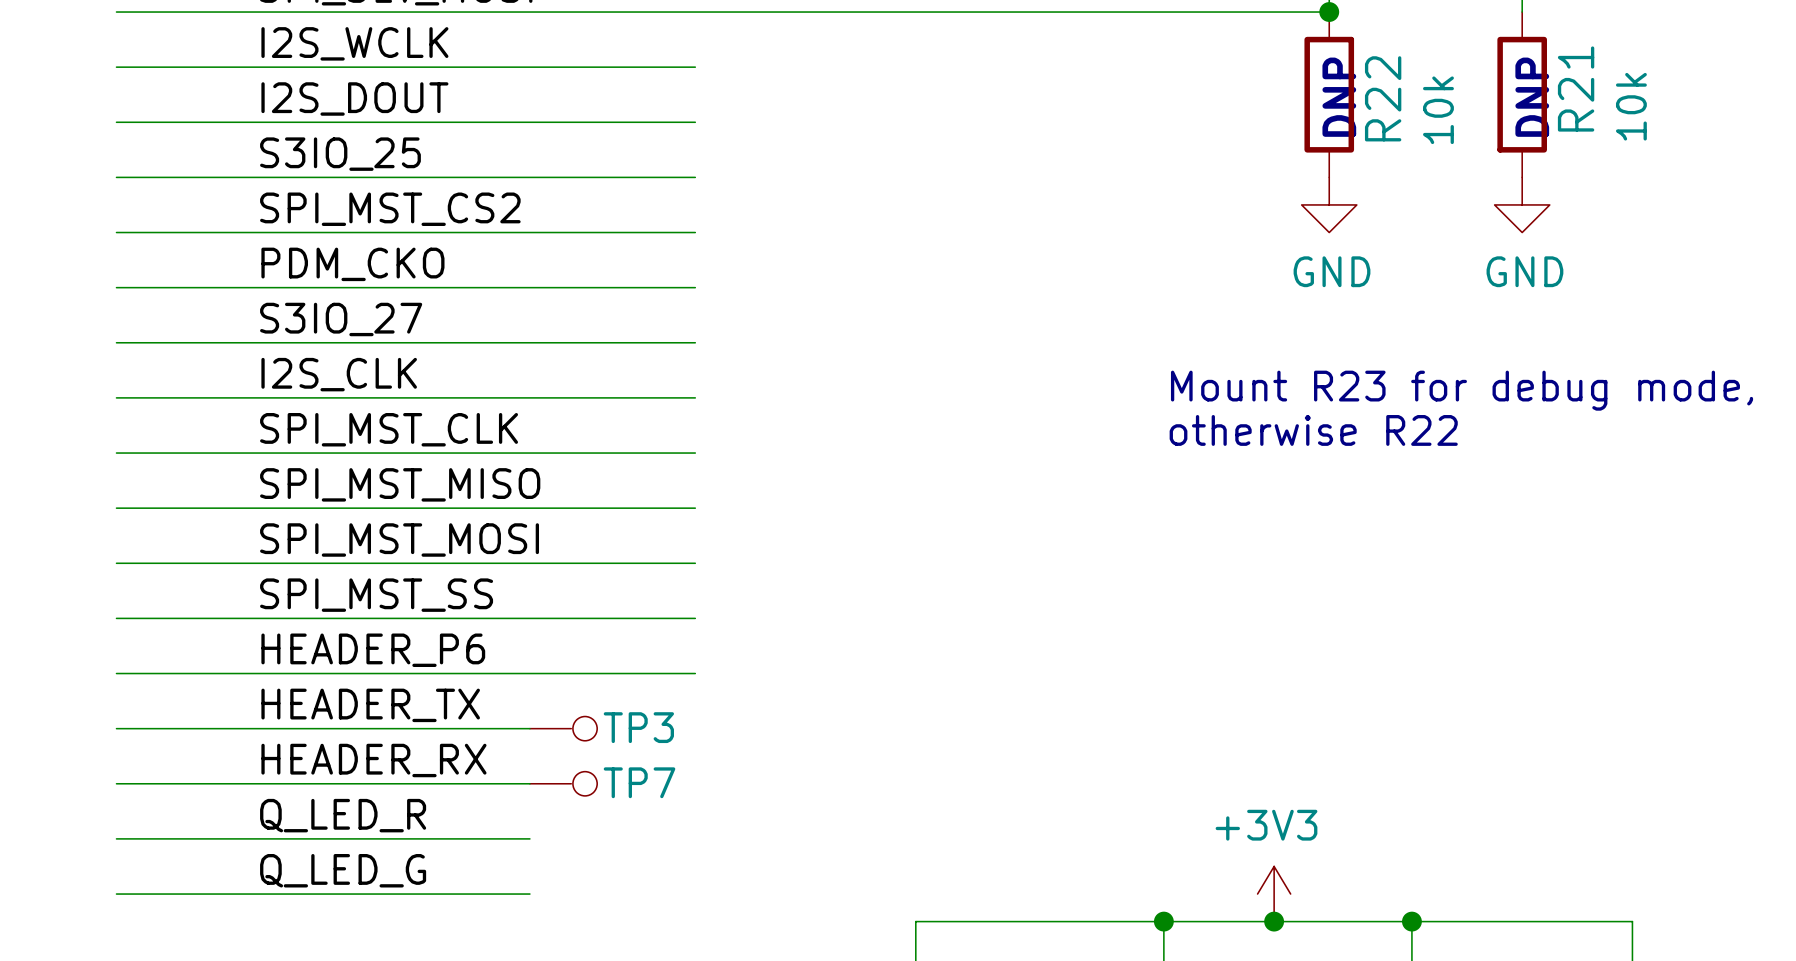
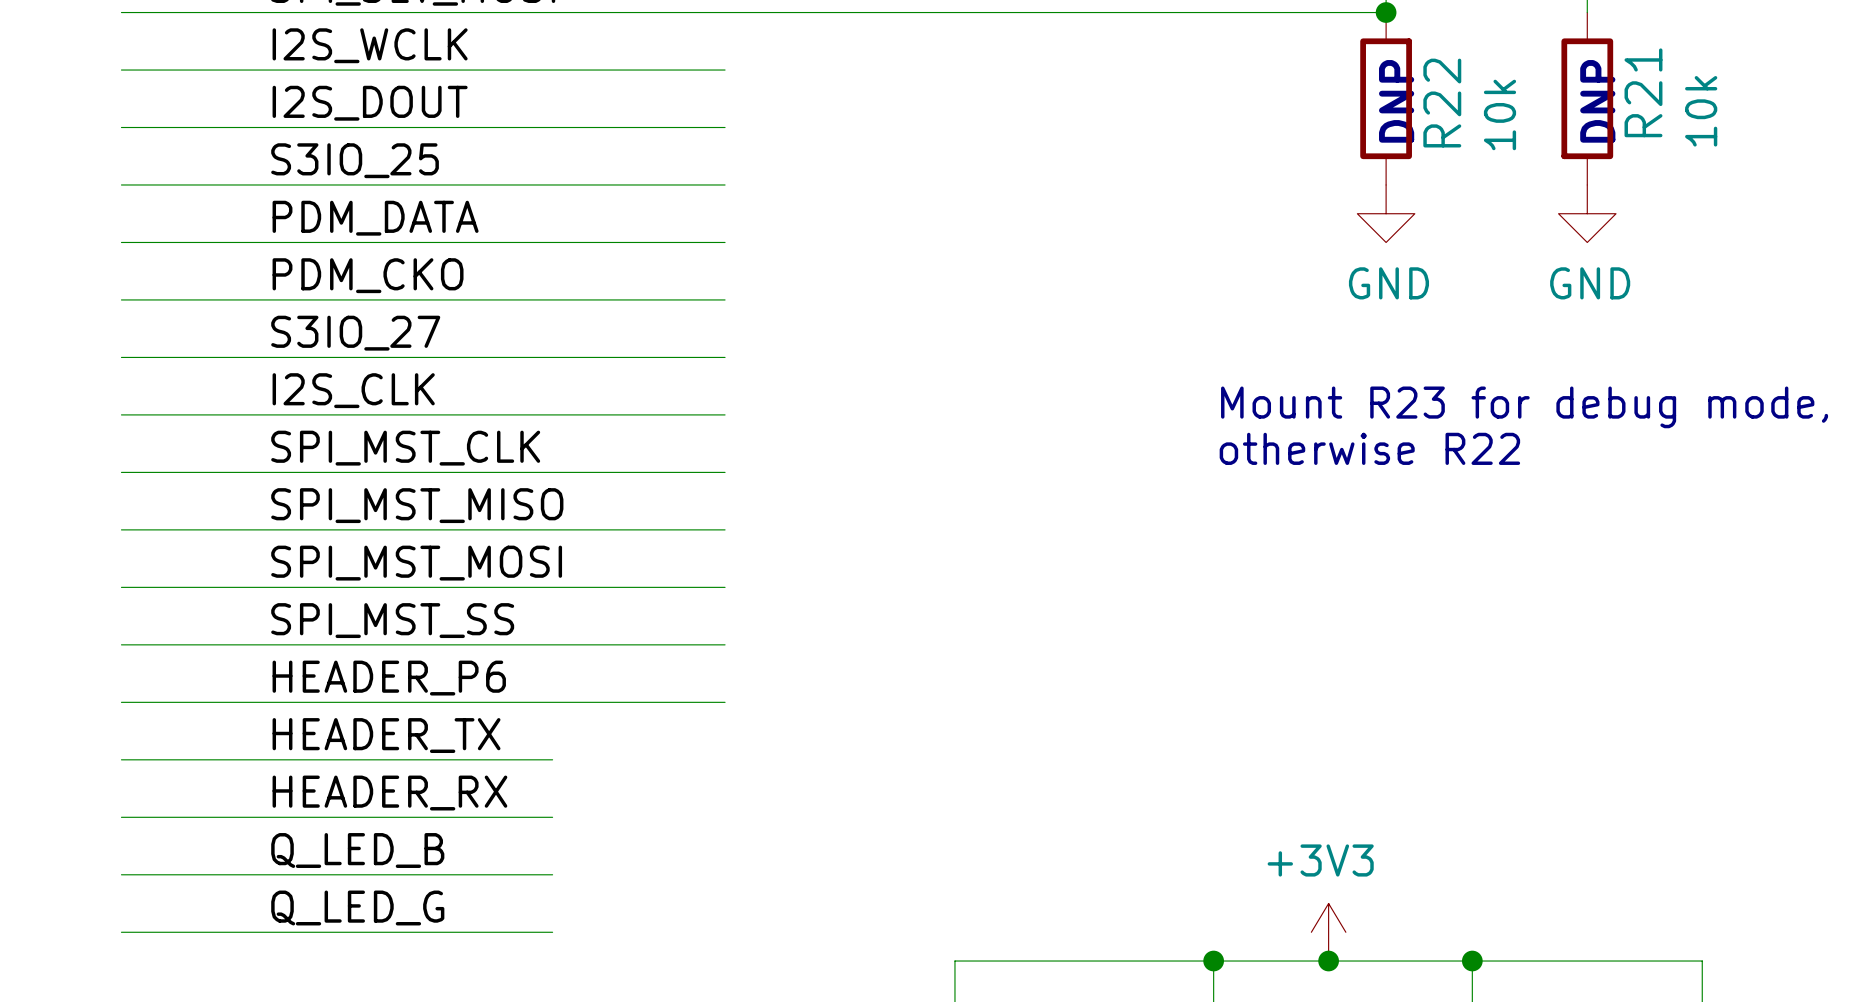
label: SPI_MST_CS2 (390, 209) -> PDM_DATA (375, 218)
TP3: (563, 728) -> none
TP7: (563, 783) -> none
label: Q_LED_R (343, 815) -> Q_LED_B (357, 850)

